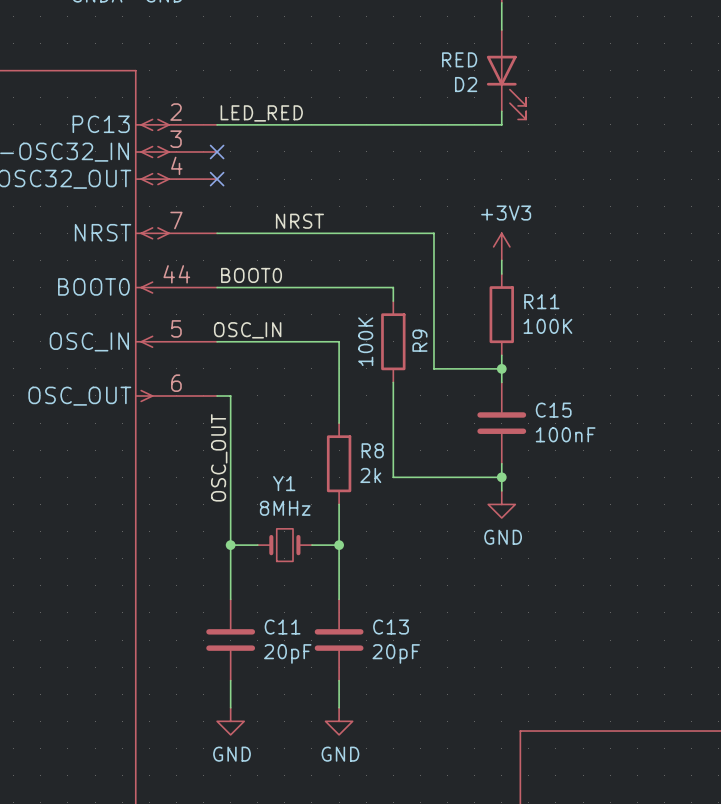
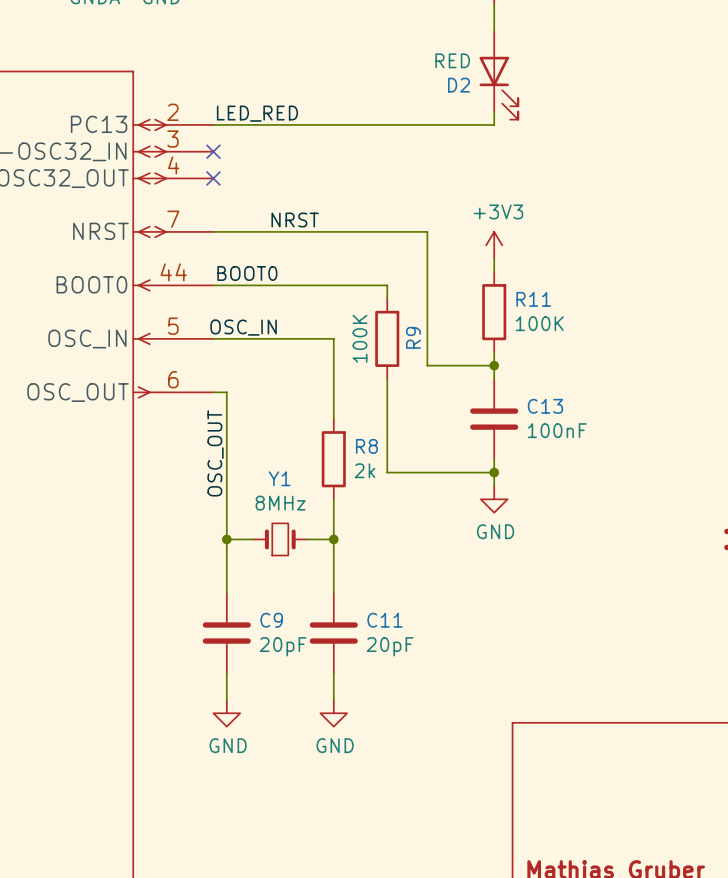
C15 name: C15 (553, 410) -> C13 (545, 406)
C11 name: C11 (282, 627) -> C9 (271, 620)
C13 name: C13 (391, 627) -> C11 (385, 620)

